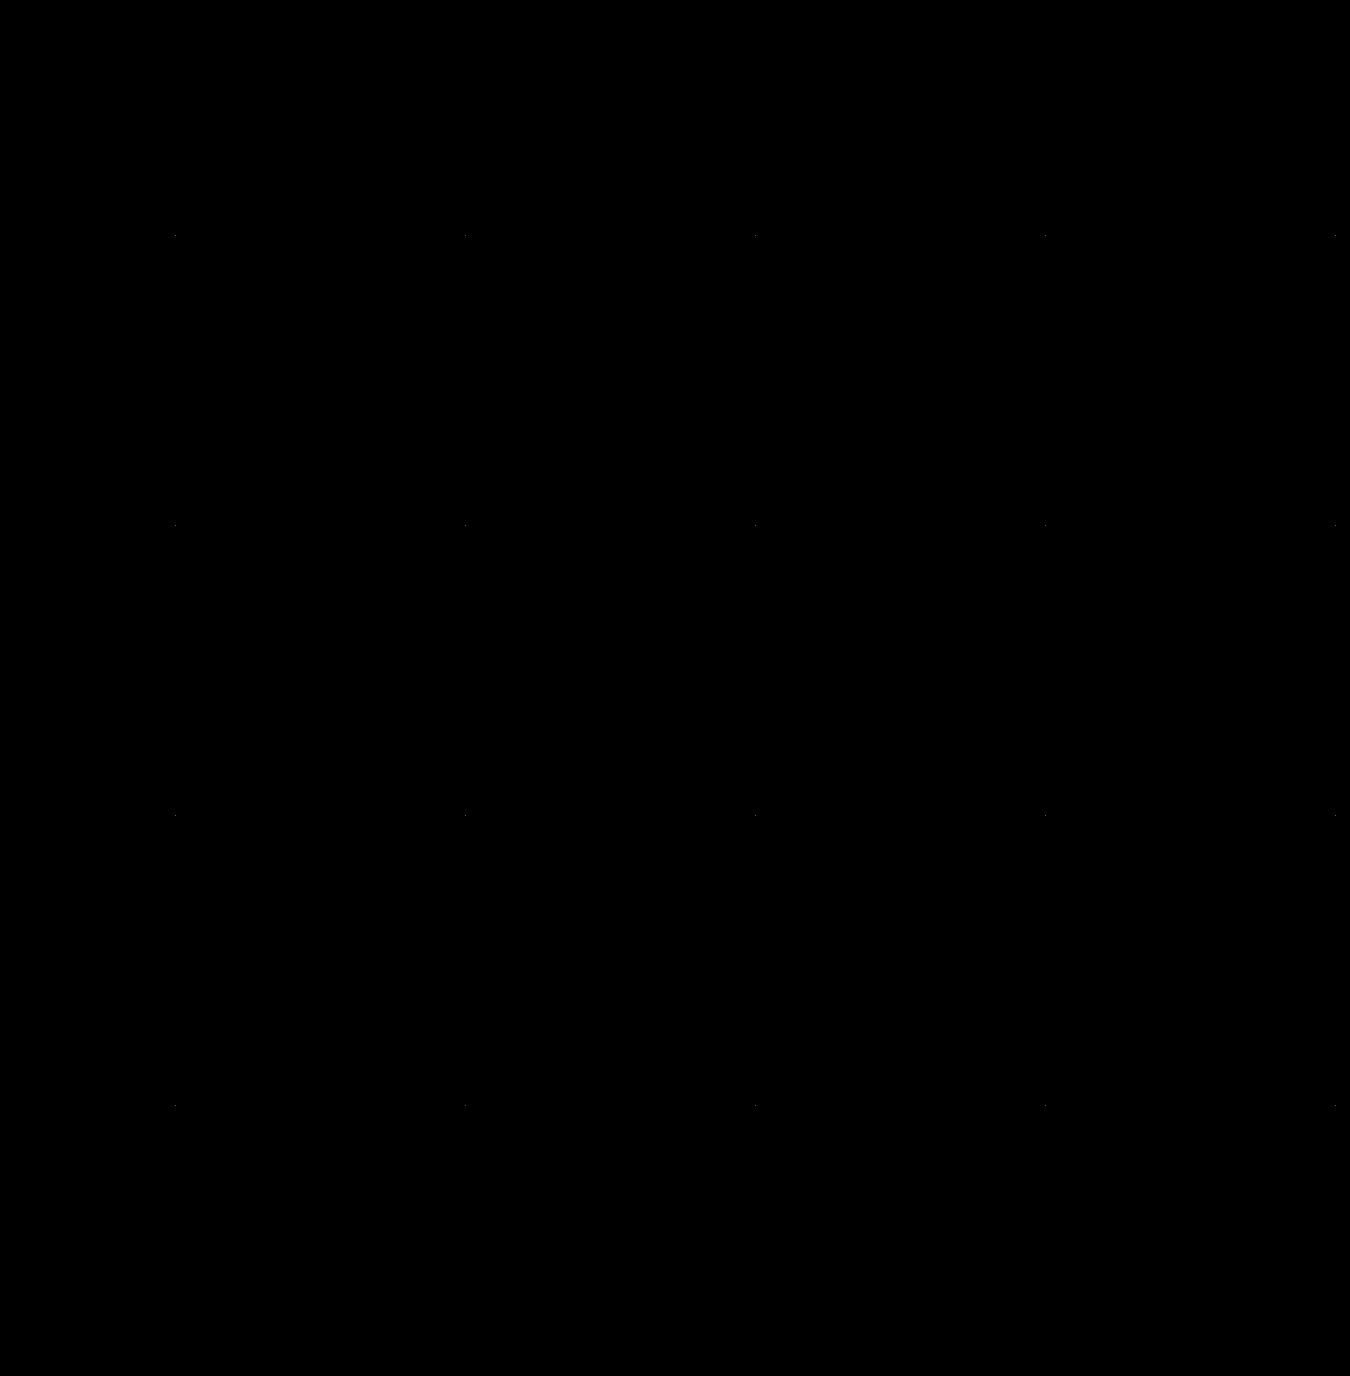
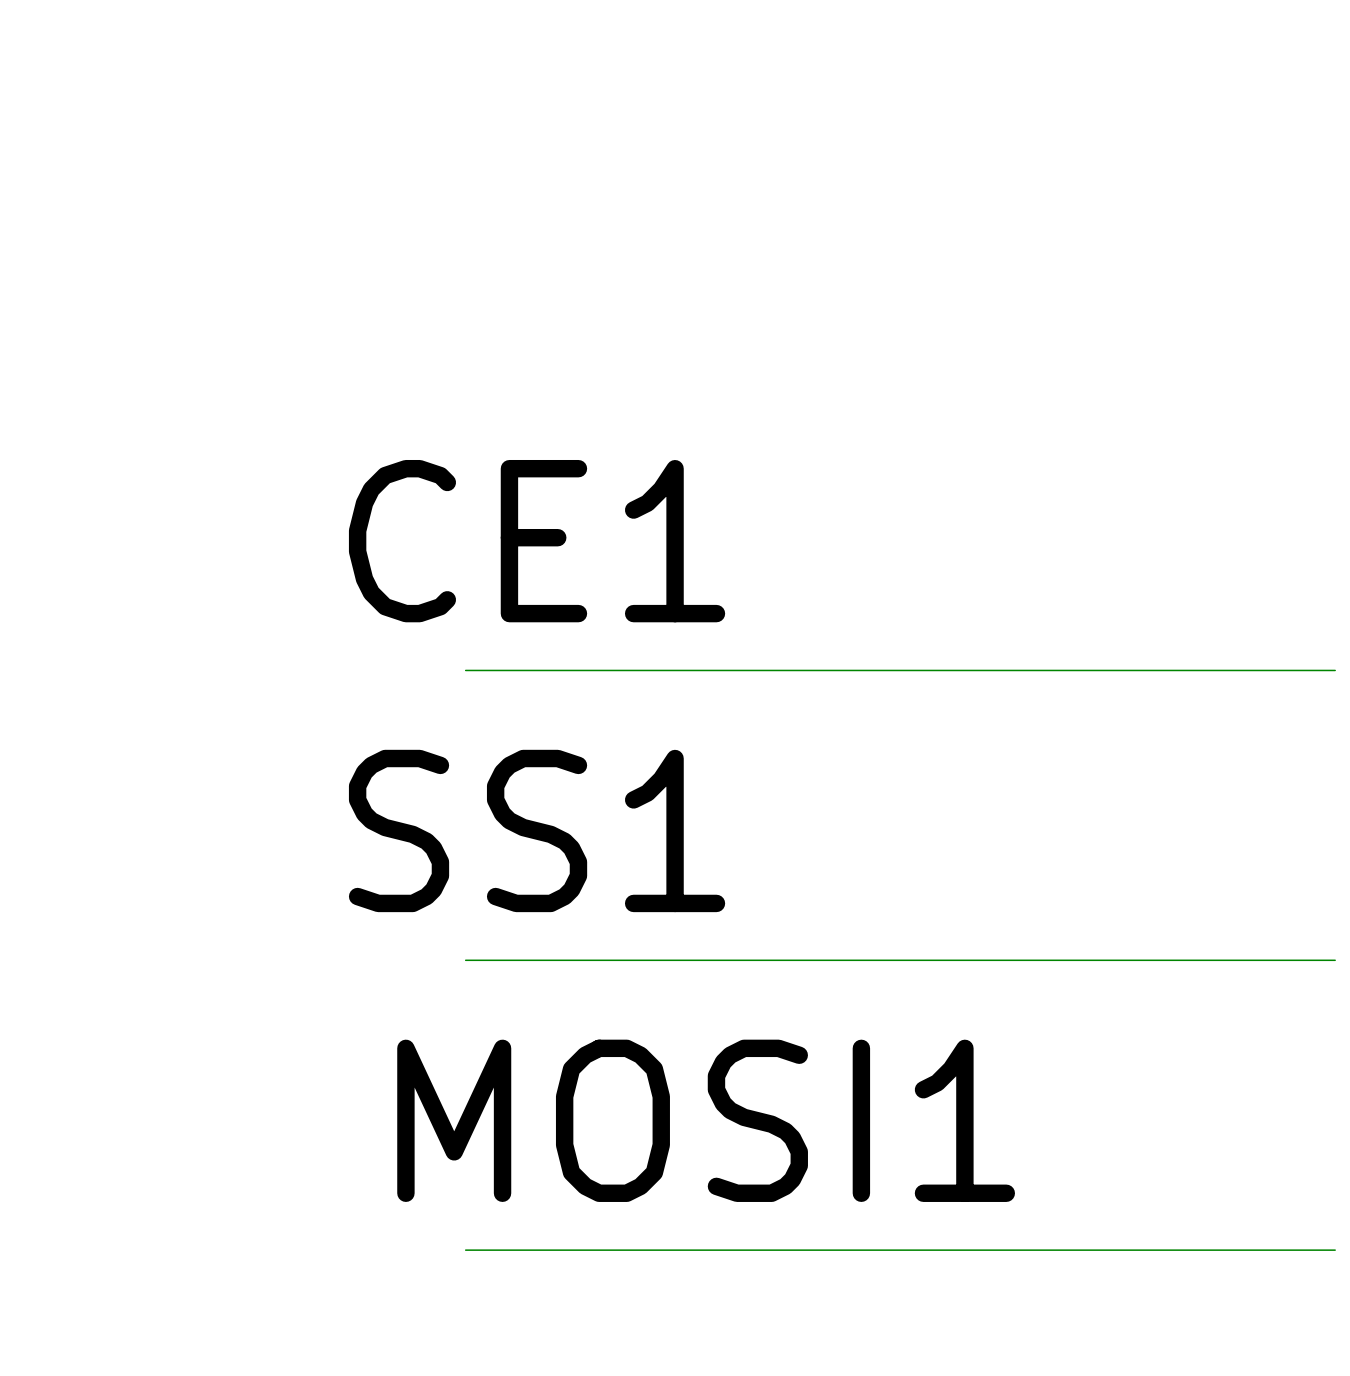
label: none -> CE1 (537, 541)
wire: none -> (465, 670) (1335, 670)
label: none -> SS1 (537, 830)
wire: none -> (465, 960) (1335, 960)
label: none -> MOSI1 (706, 1120)
wire: none -> (465, 1250) (1335, 1250)

